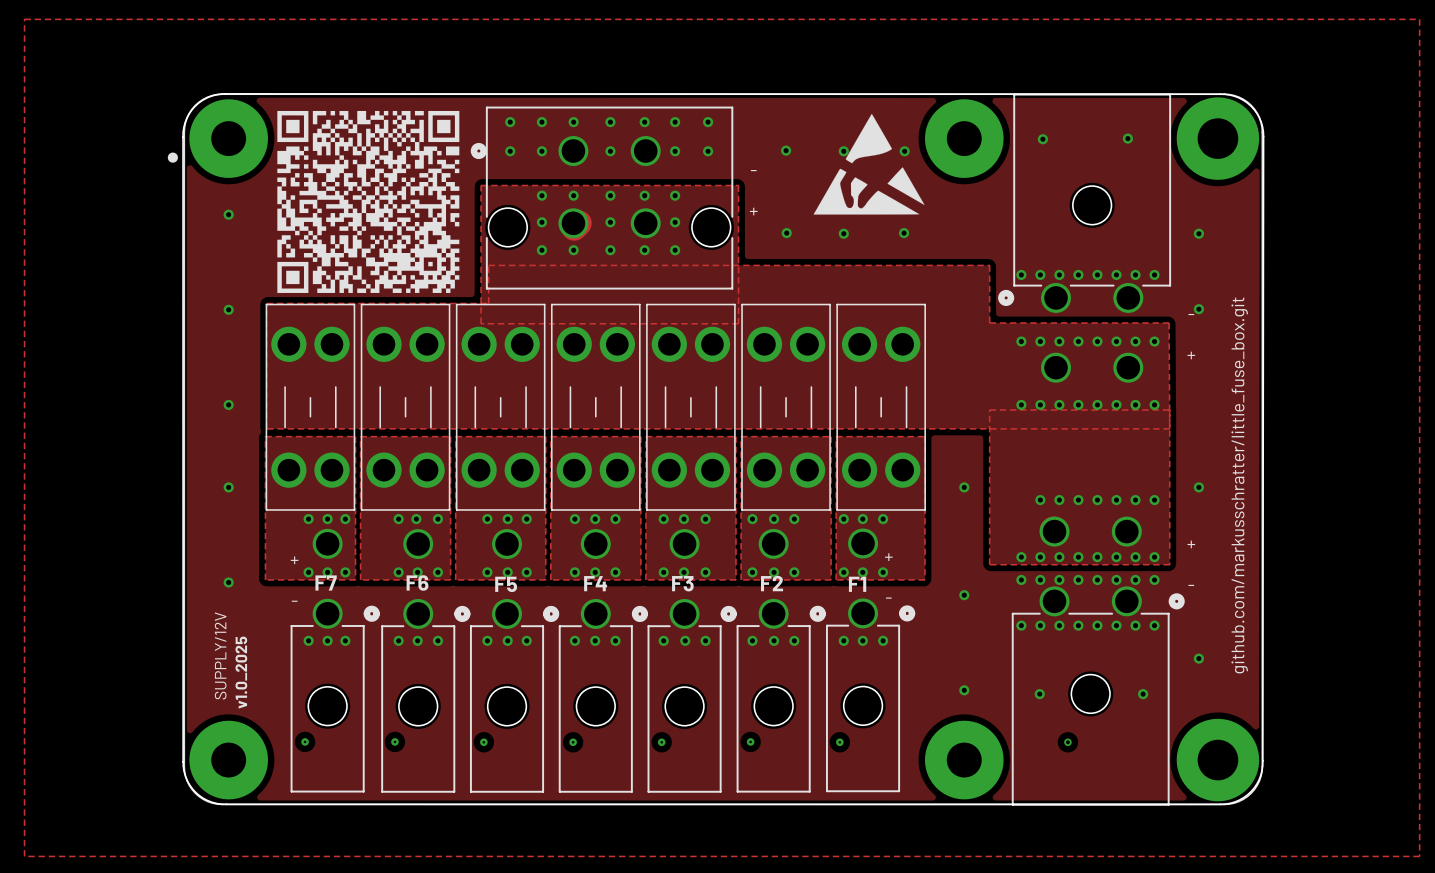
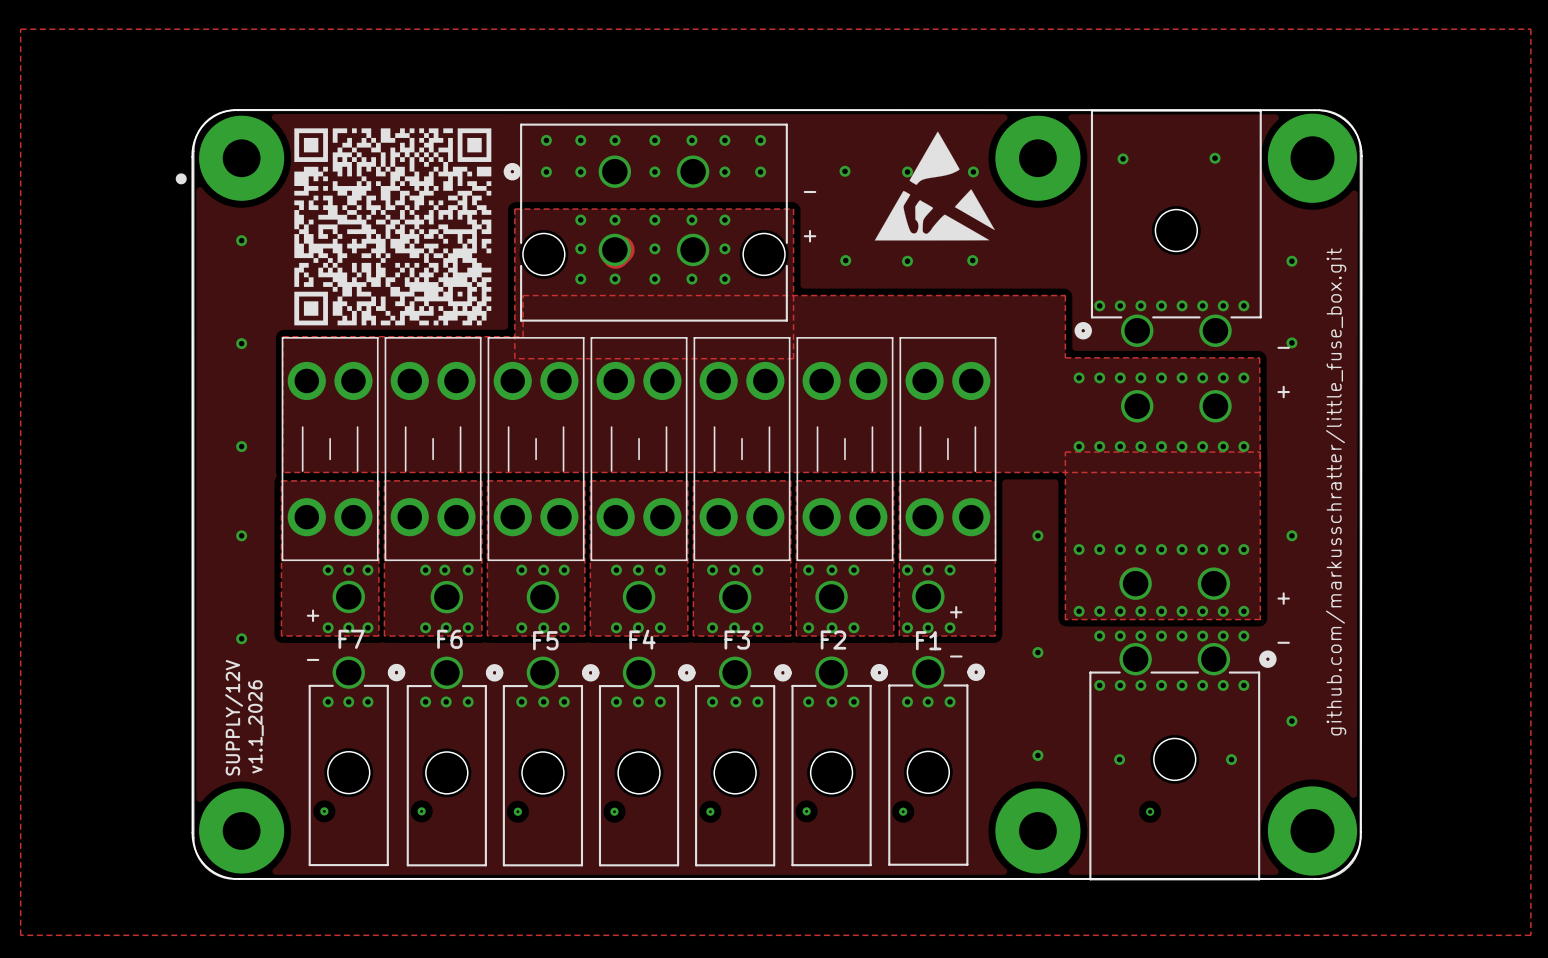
via: none -> (1079, 377)
via: none -> (1079, 446)
via: none -> (1079, 549)
via: none -> (1099, 549)
via: none -> (1079, 611)
text: v1.0_2025 (241, 672) -> v1.1_2026 (255, 726)

